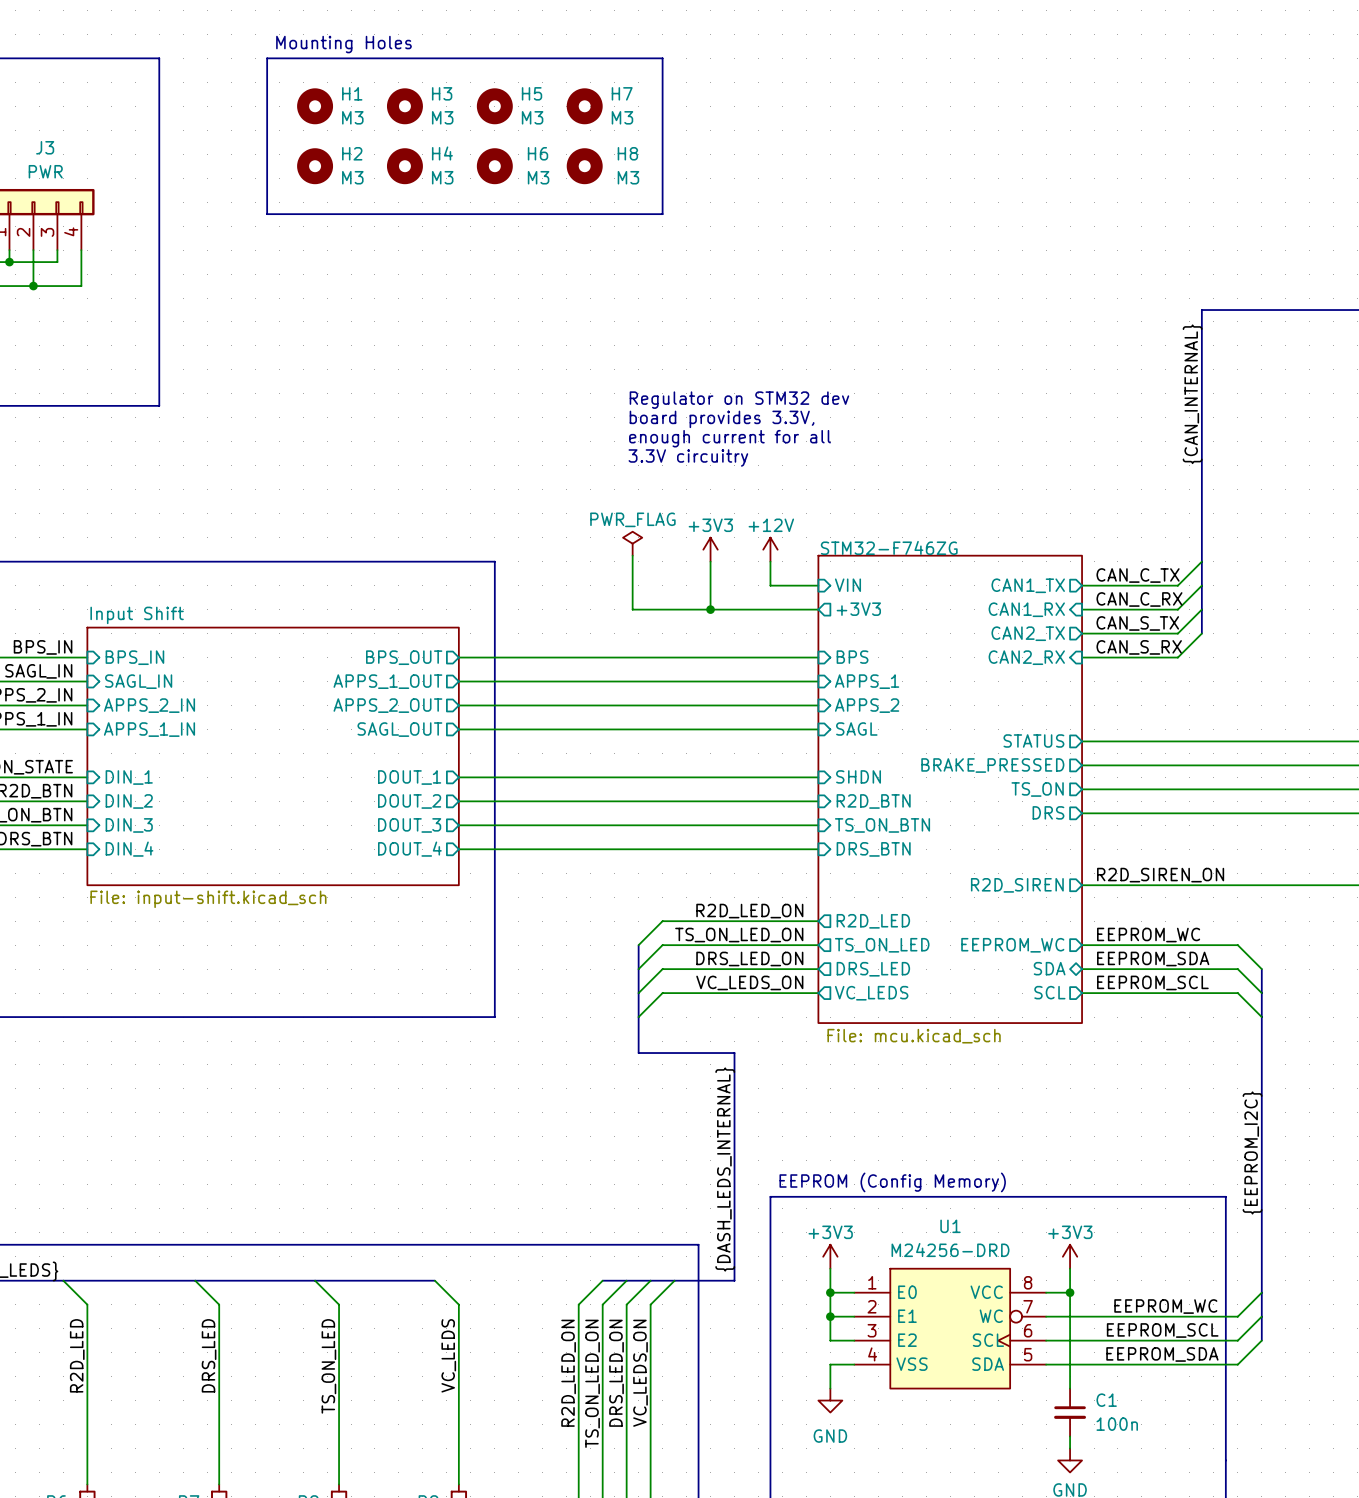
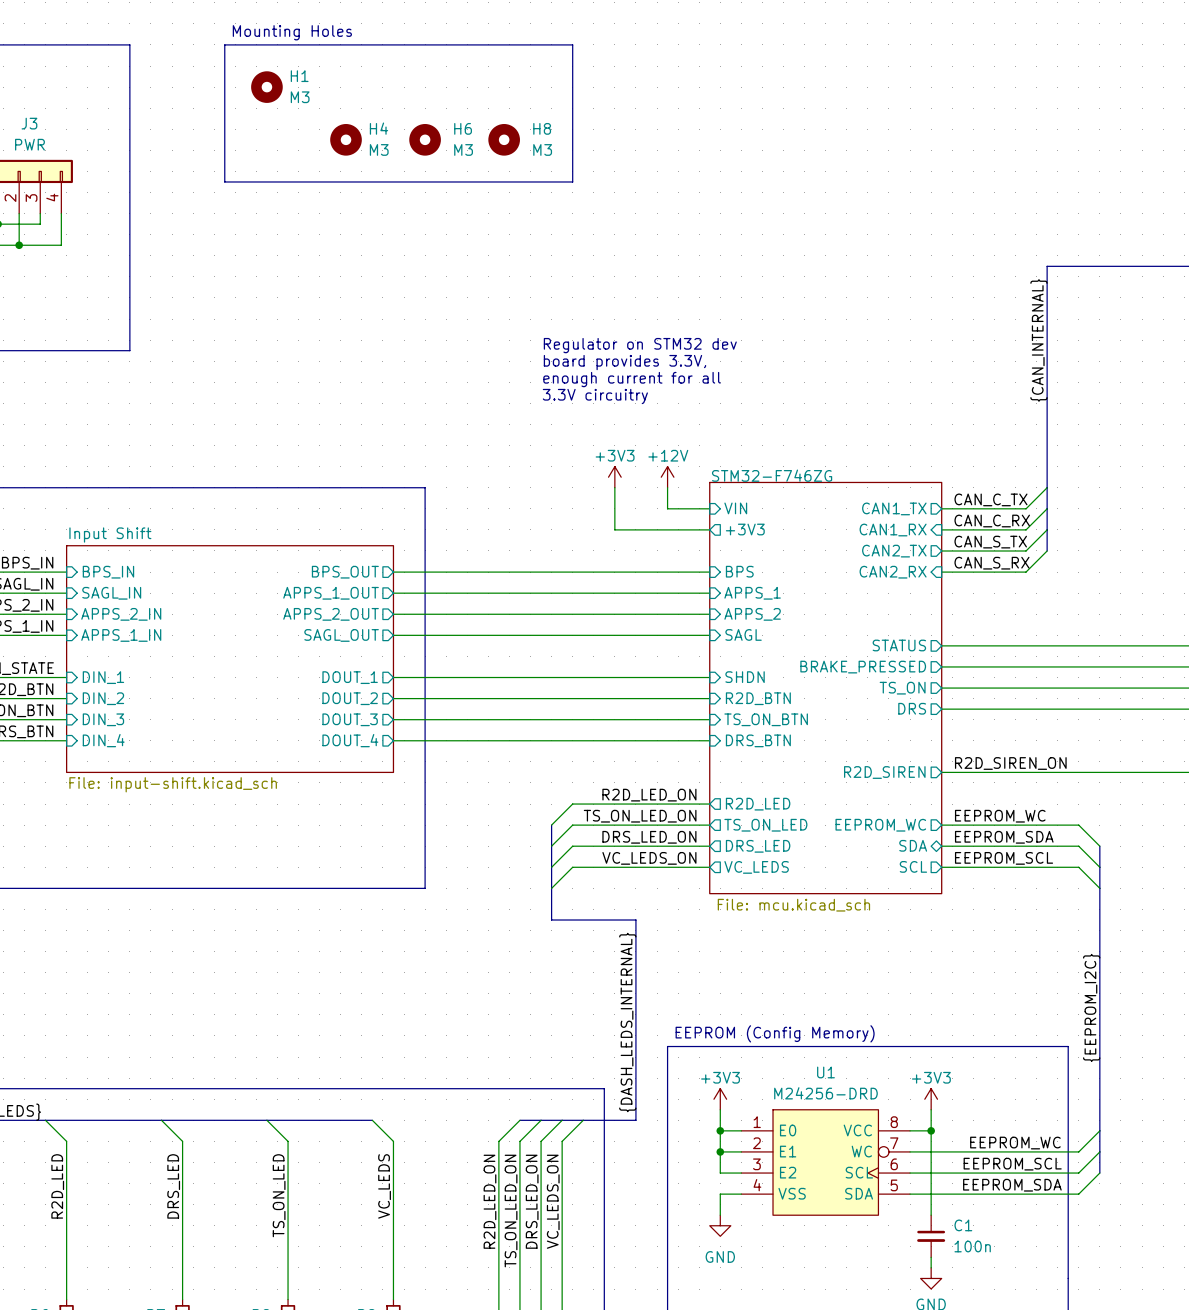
H3: M3 (404, 106) -> none
H5: M3 (494, 106) -> none
H7: M3 (584, 106) -> none
H2: M3 (315, 166) -> none
power symbol: PWR_FLAG (632, 543) -> none
wire: (632, 555) (632, 609) (710, 609) -> none
junction: (710, 609) -> none

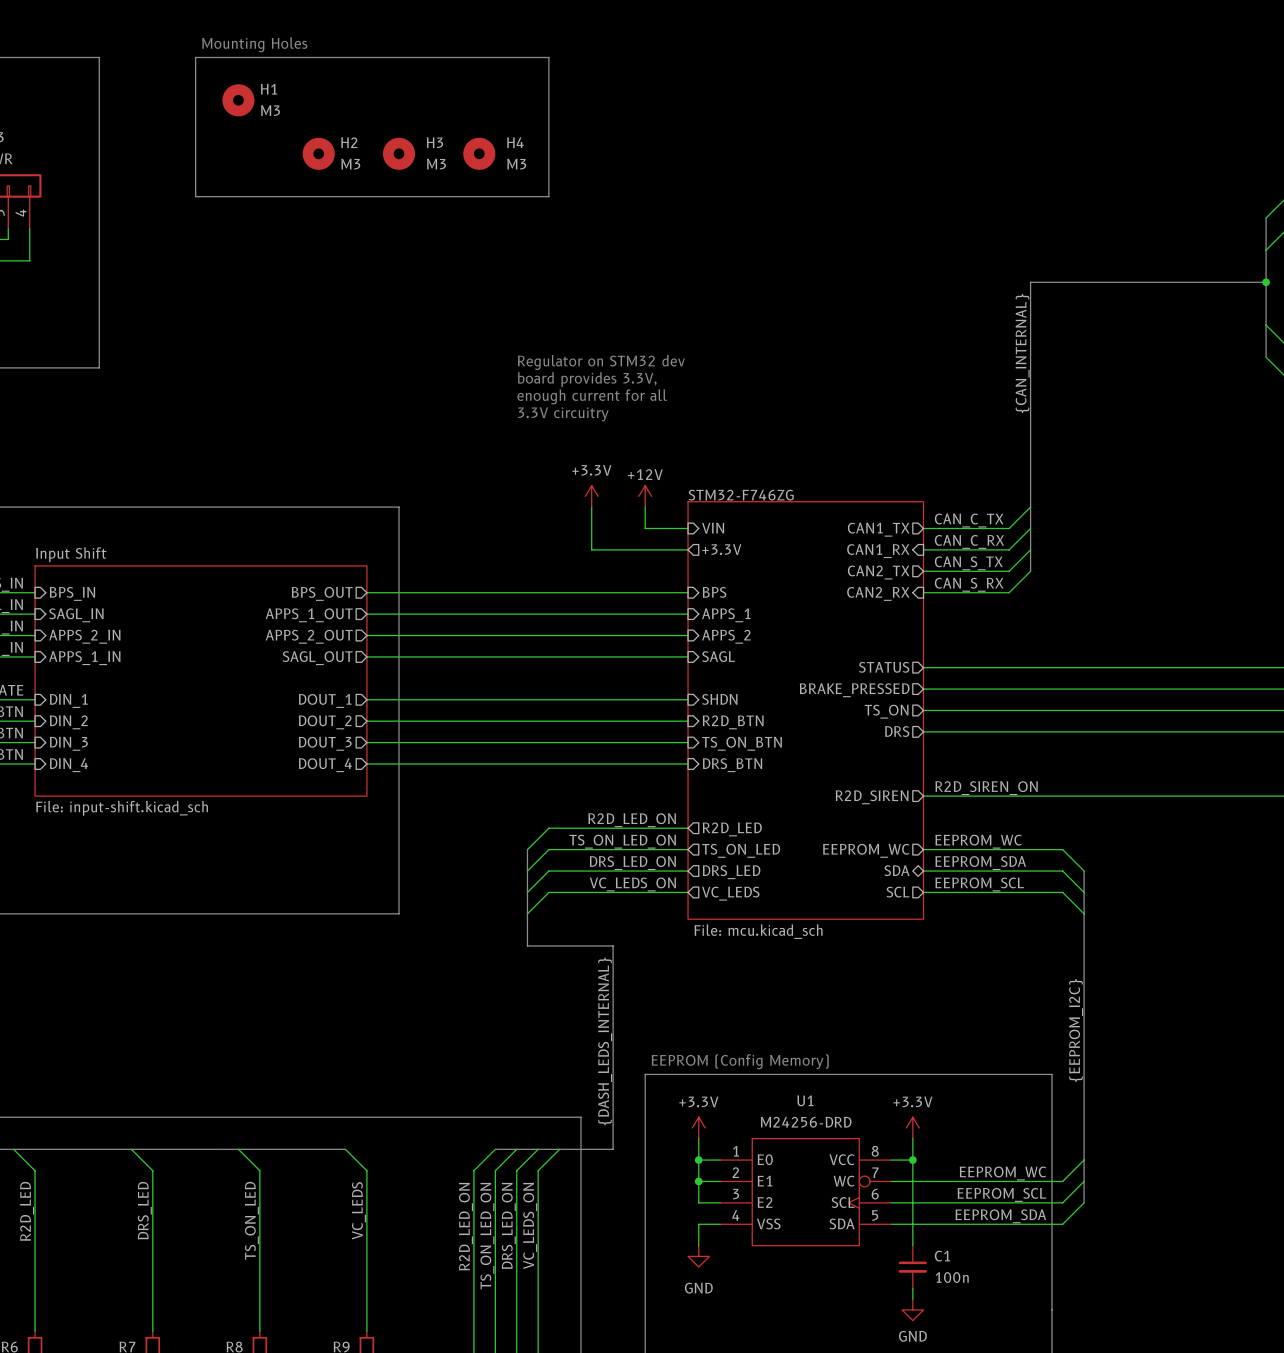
H4 name: H4 (378, 128) -> H2 (349, 142)
H6 name: H6 (463, 128) -> H3 (434, 142)
H8 name: H8 (542, 128) -> H4 (515, 142)
power symbol: +3V3 (614, 477) -> +3.3V (591, 496)
sheet pin: +3V3 (745, 529) -> +3.3V (721, 549)
power symbol: +3V3 (720, 1099) -> +3.3V (698, 1127)
power symbol: +3V3 (931, 1099) -> +3.3V (912, 1127)

